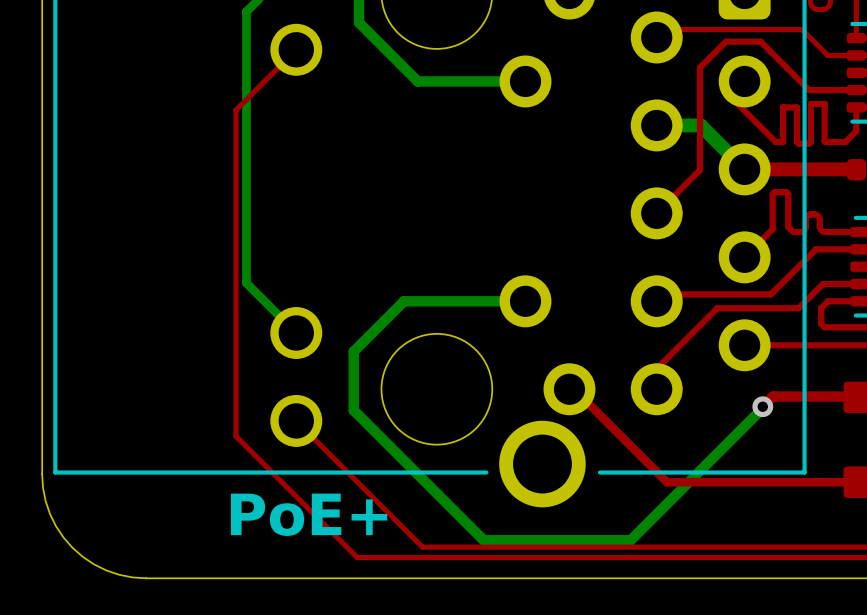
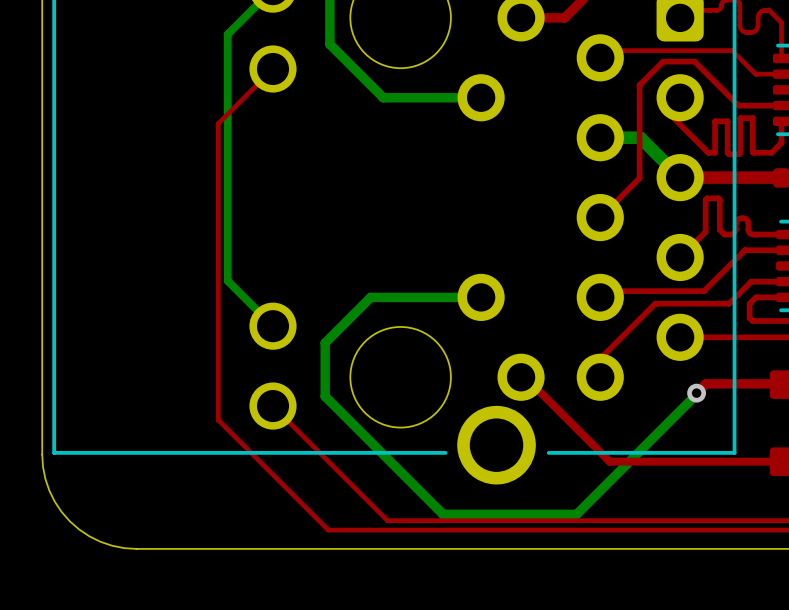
text: PoE+ (309, 514) -> none

